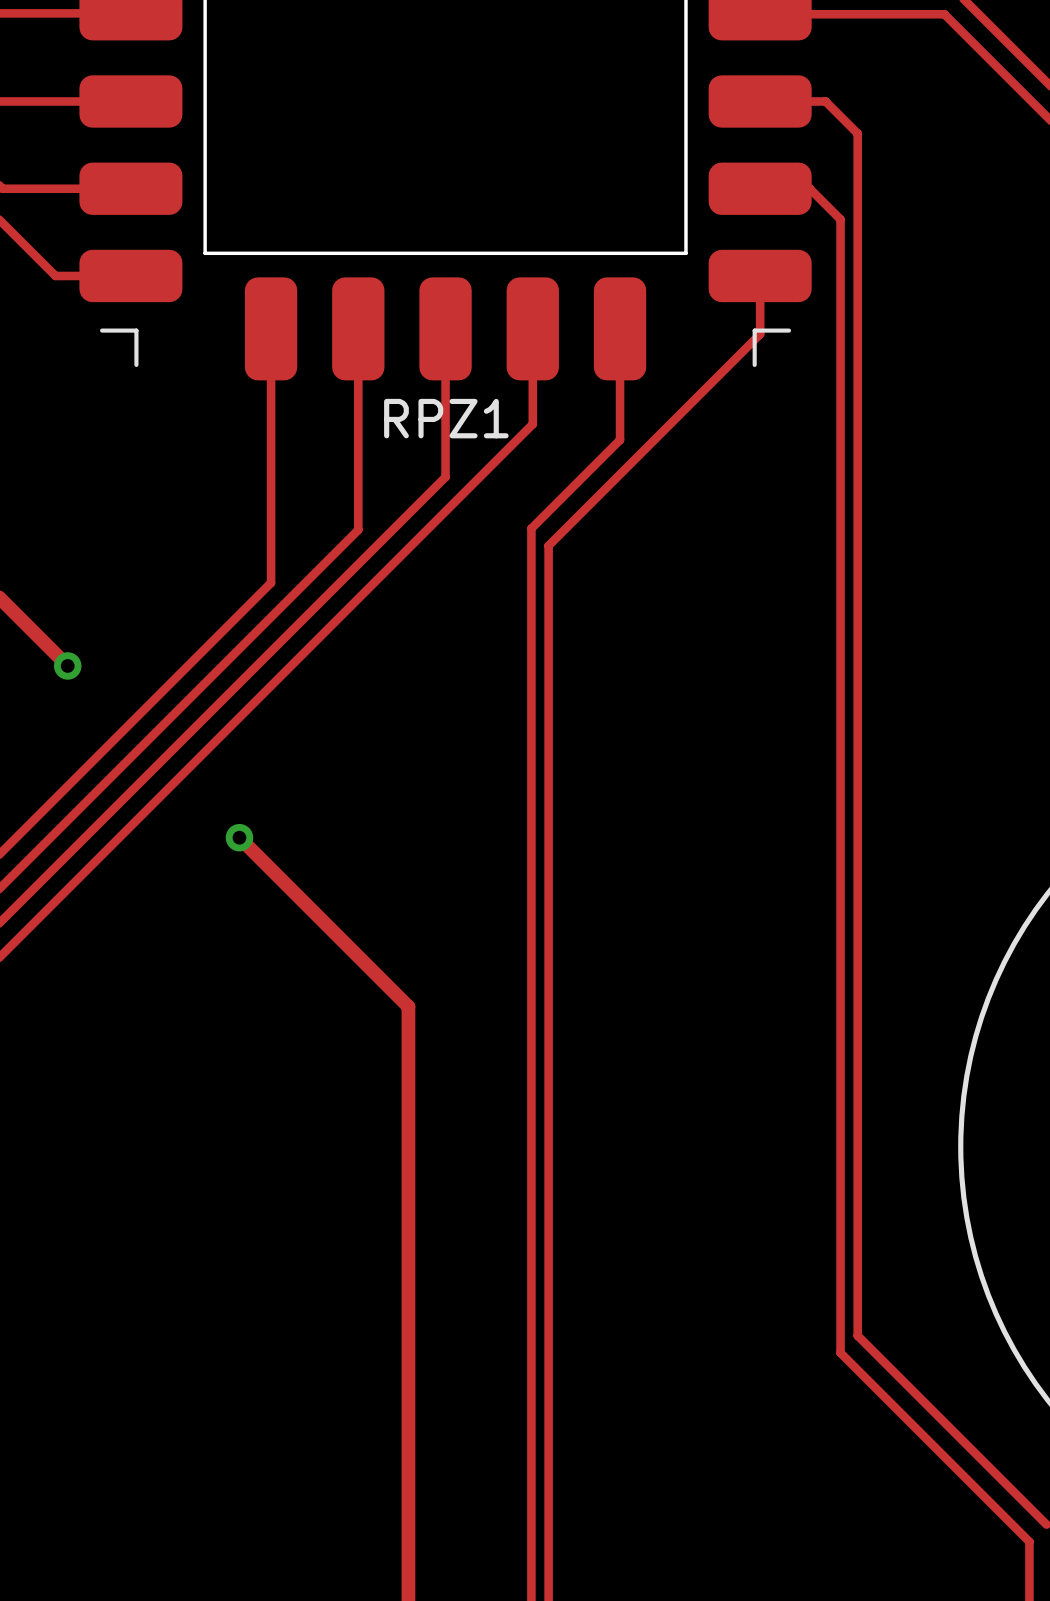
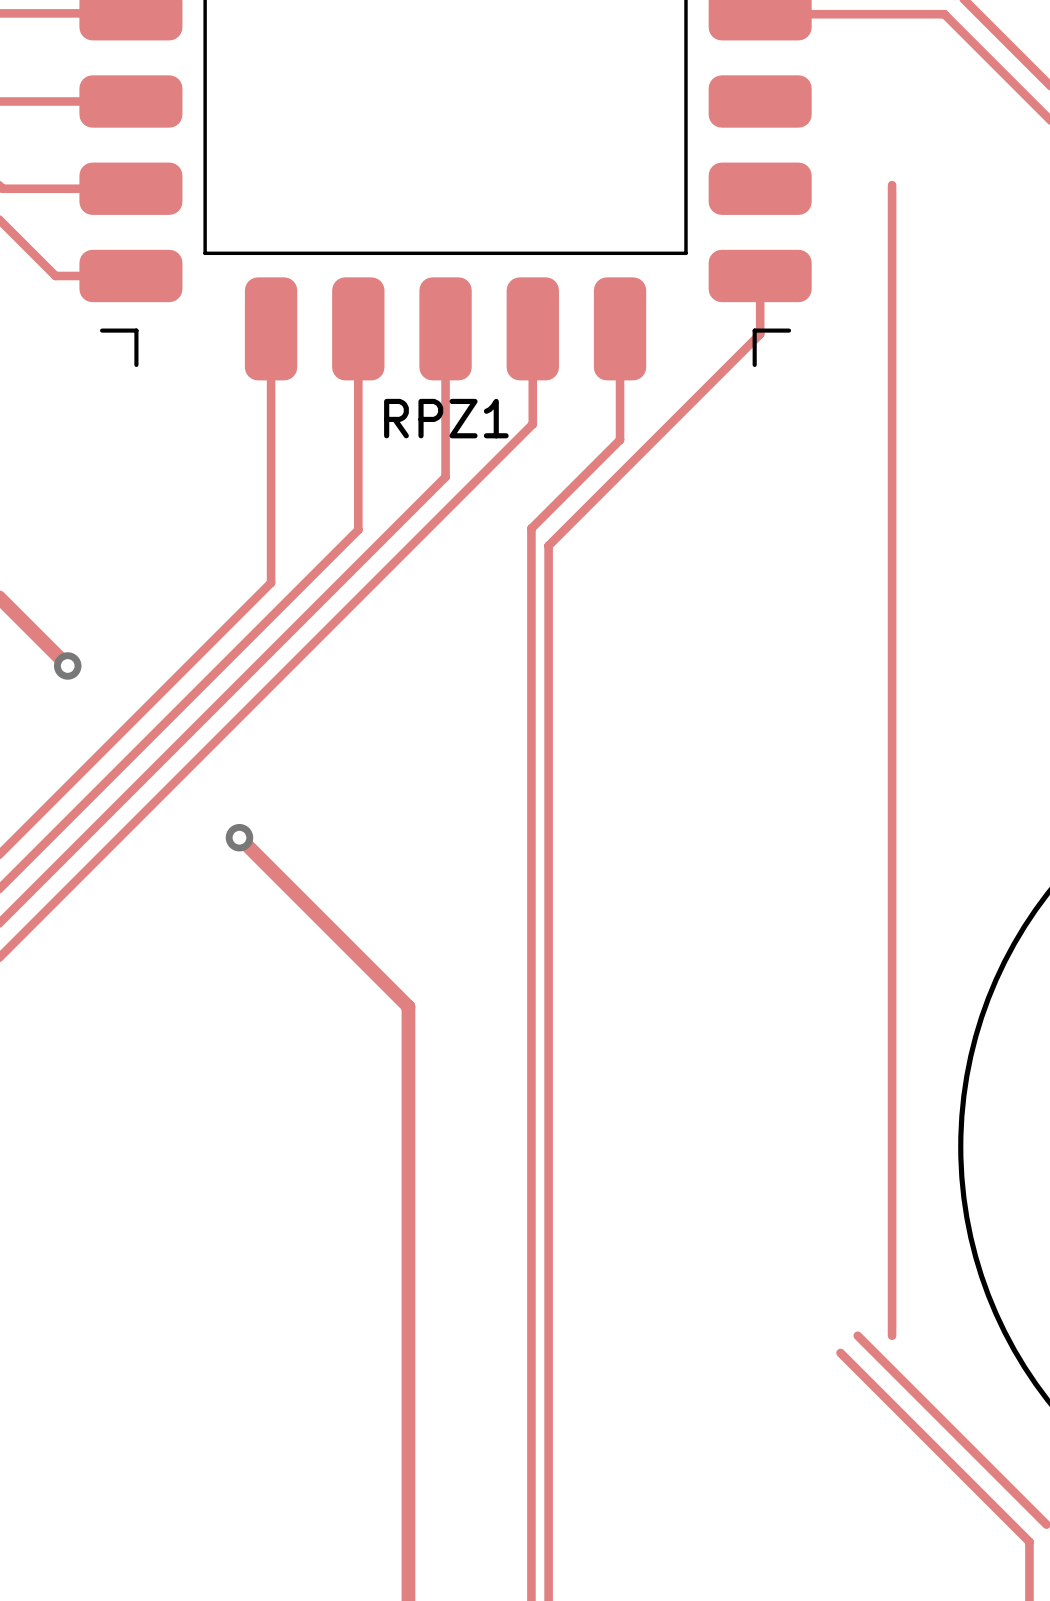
track: (760, 101) (825, 101) (857, 133) (857, 1335) -> none
track: none -> (892, 185) (892, 1335)
track: (760, 188) (809, 188) (840, 219) (840, 1352) -> none

